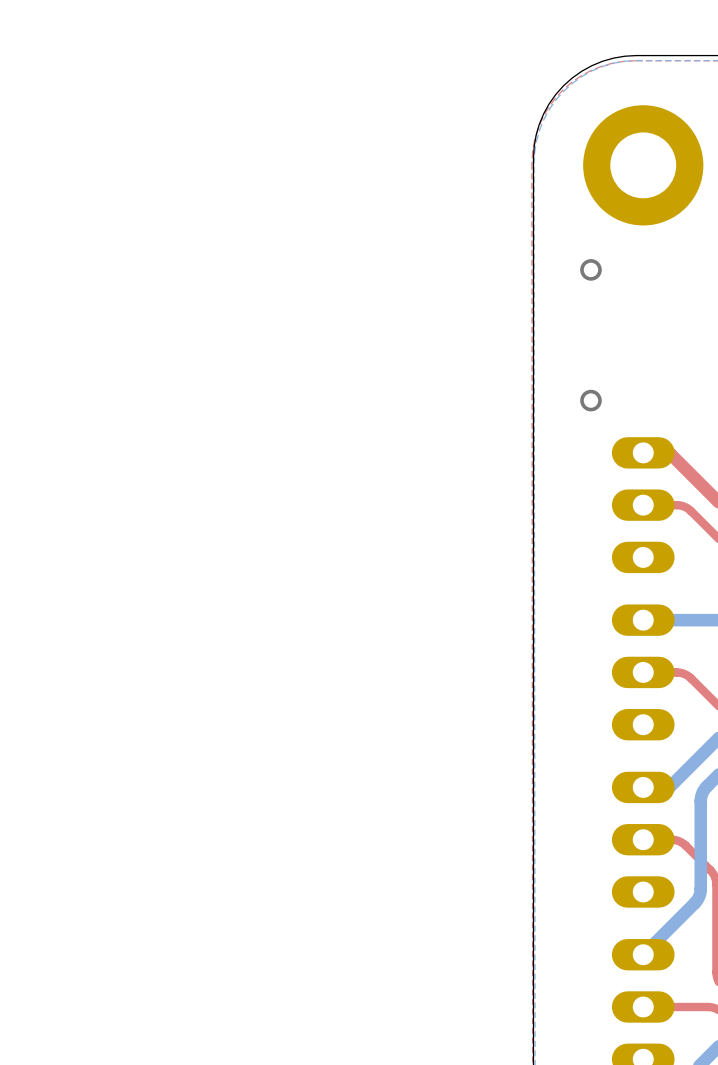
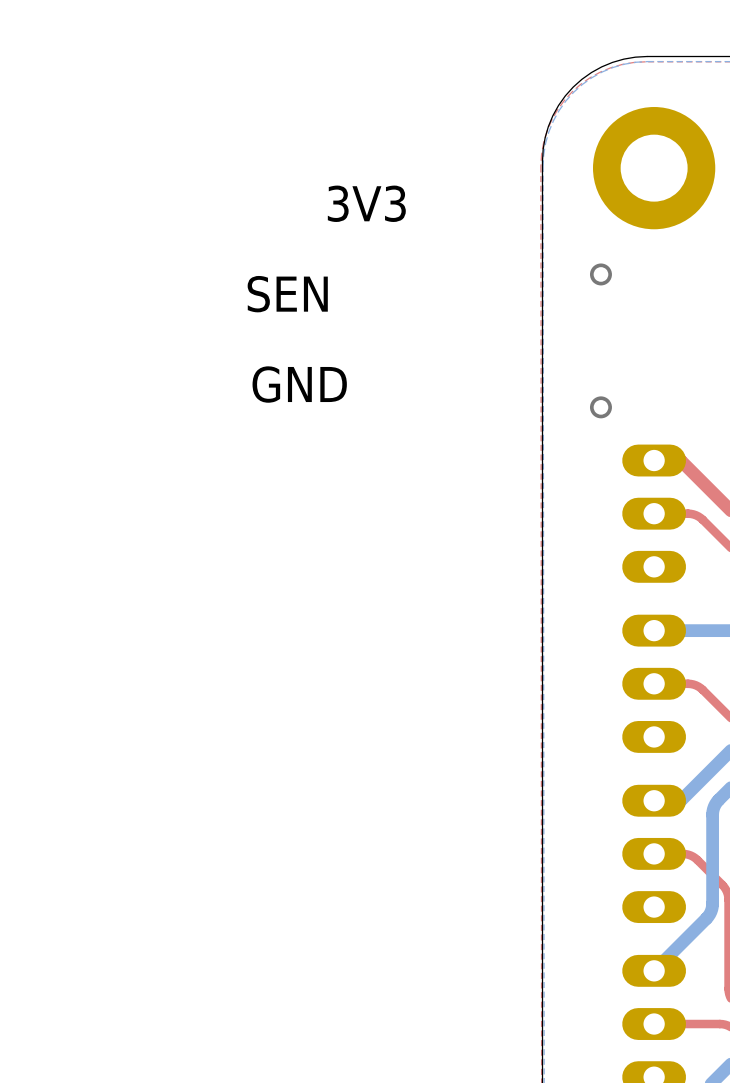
text: none -> 3V3 (366, 203)
text: none -> SEN (287, 294)
text: none -> GND (299, 384)

